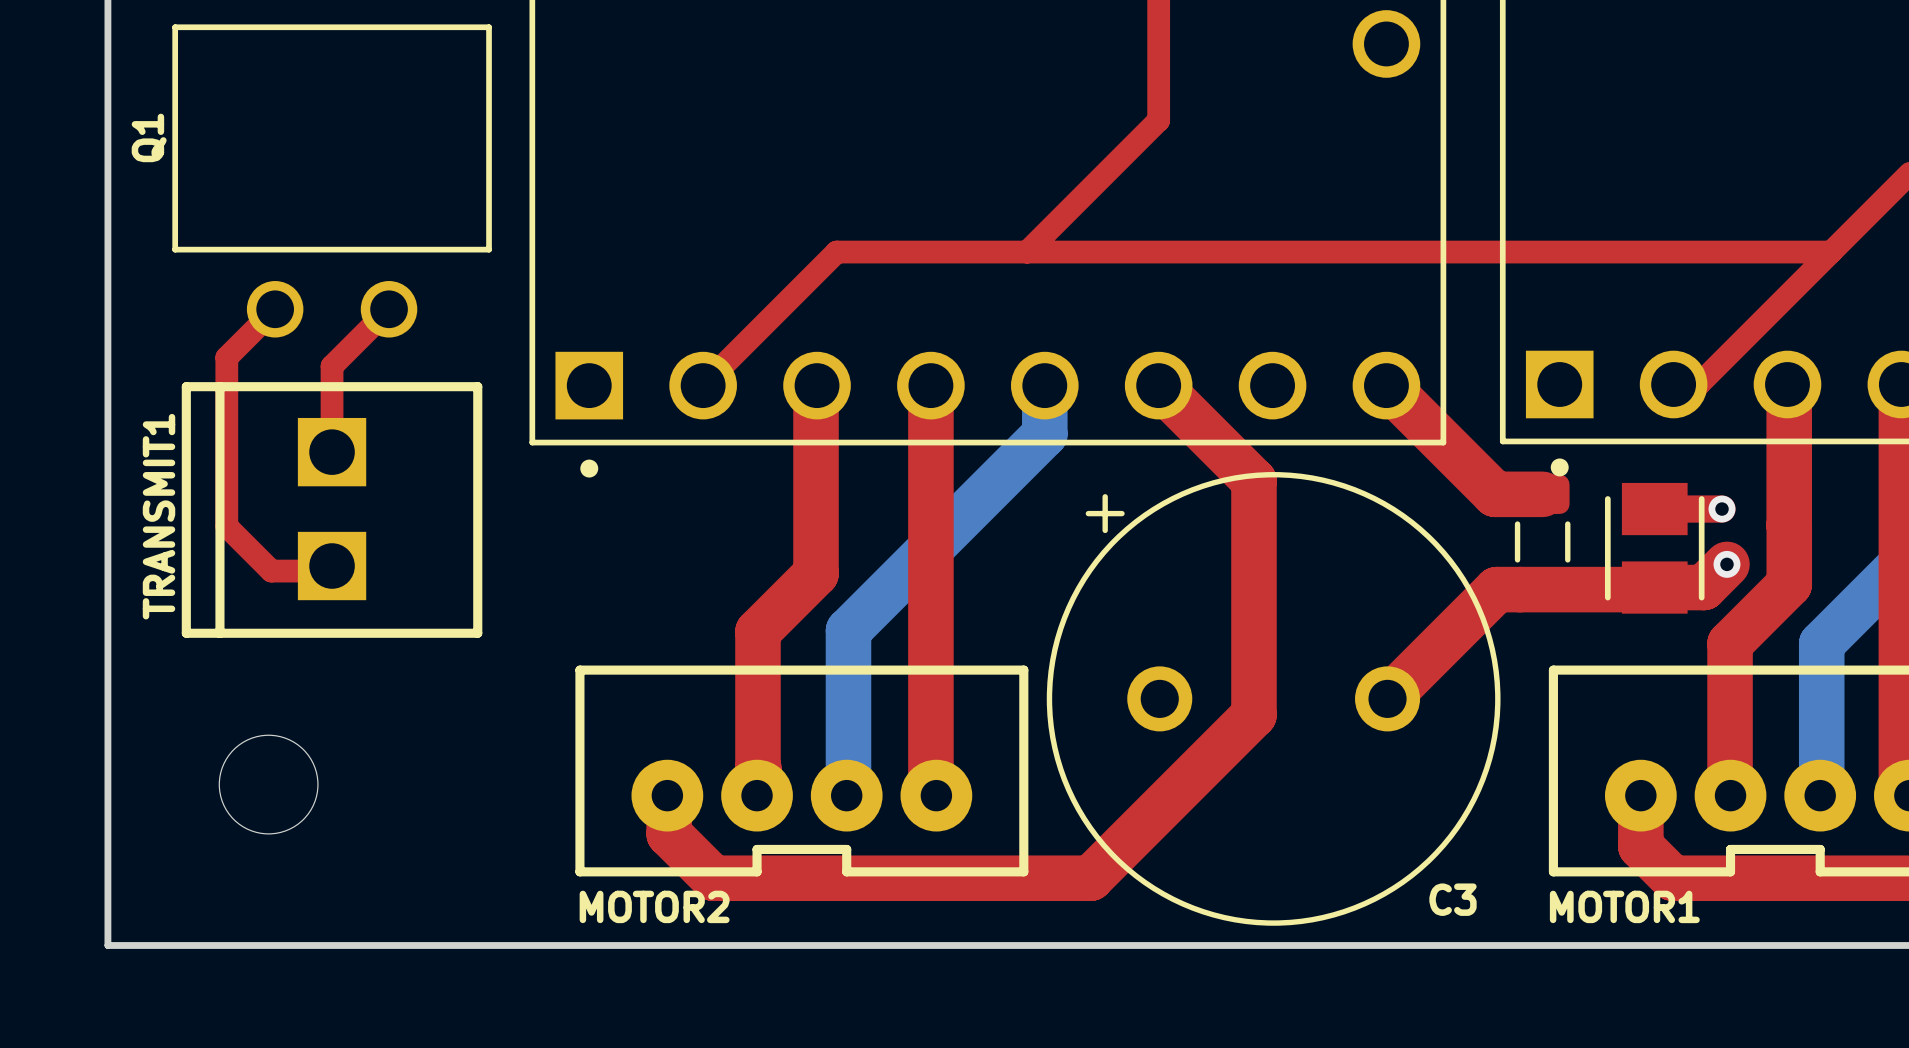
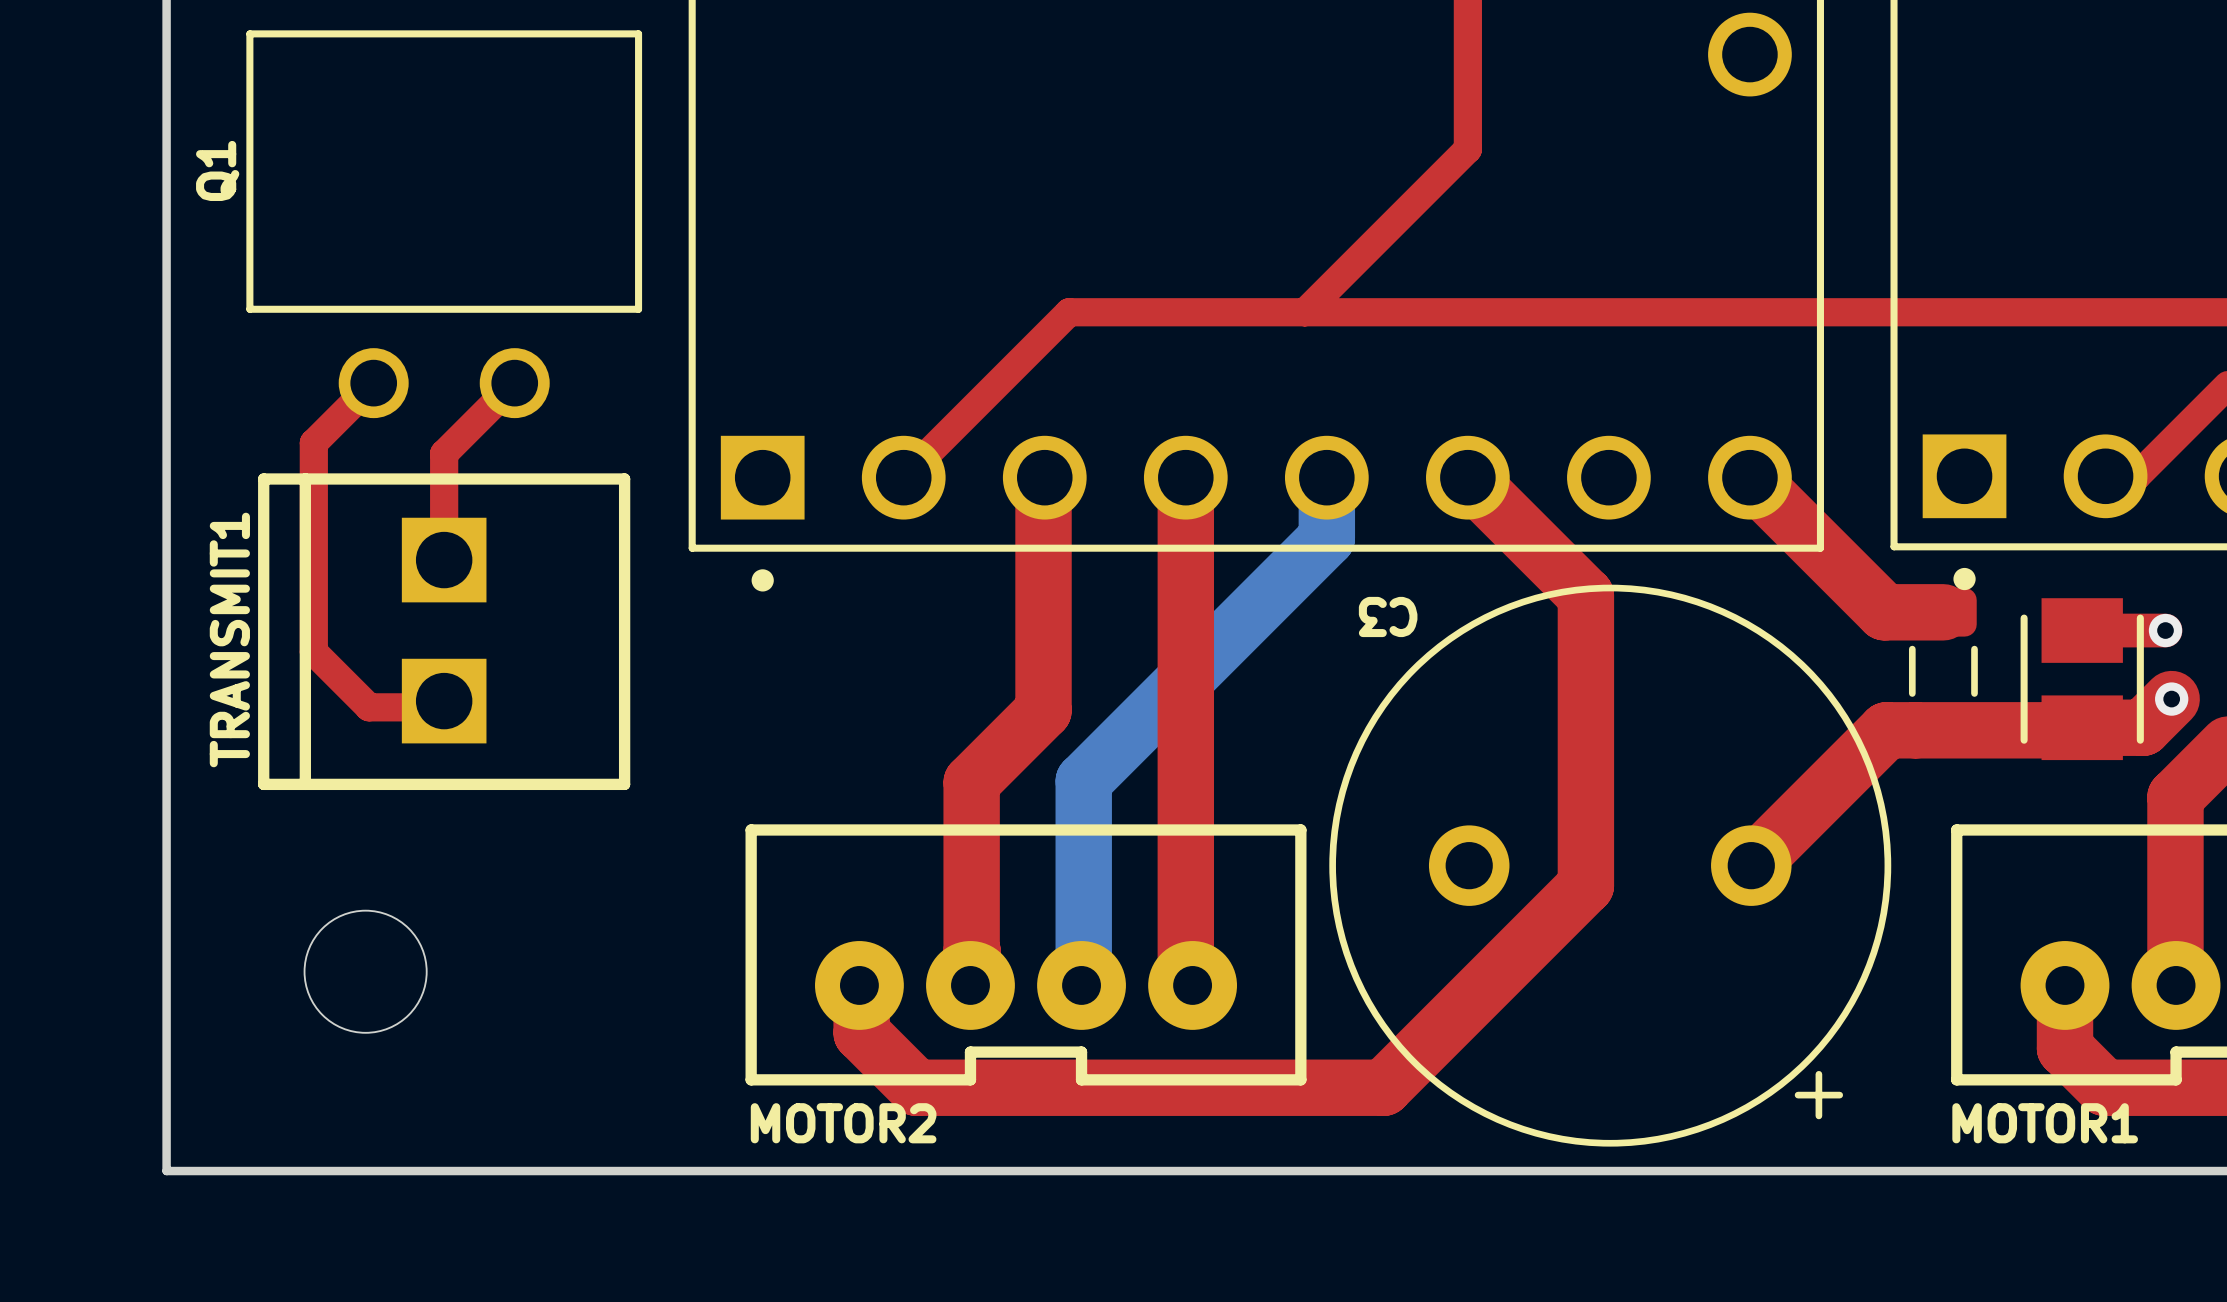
C3 rotation: 0° (1273, 698) -> 180° (1610, 865)

